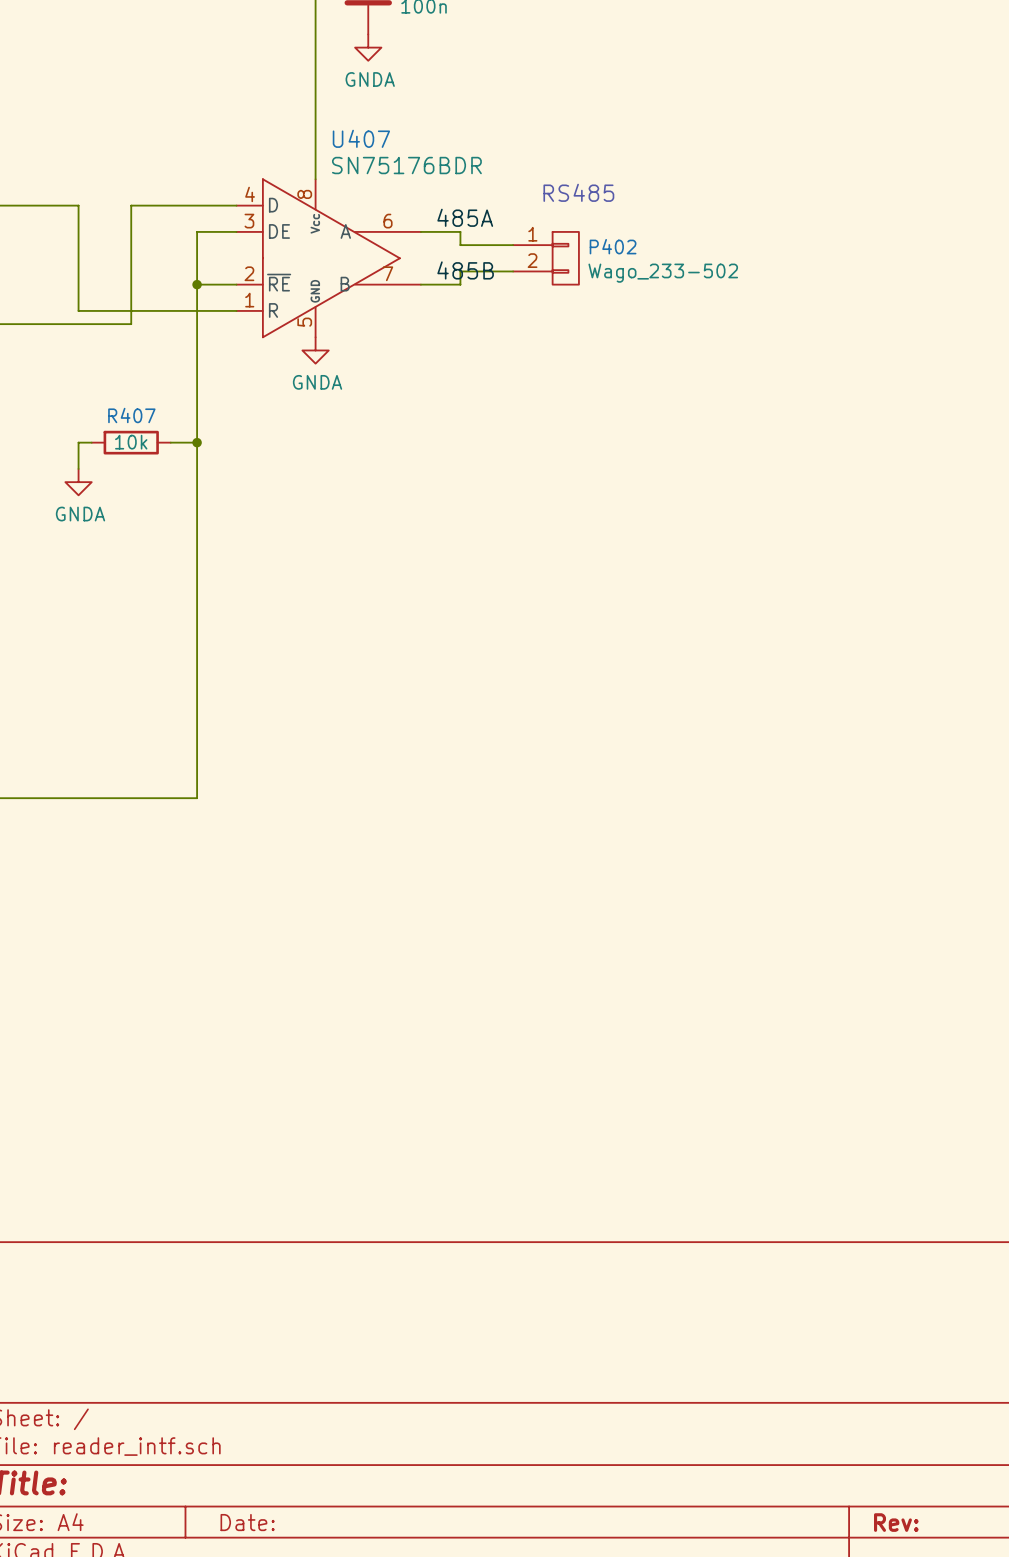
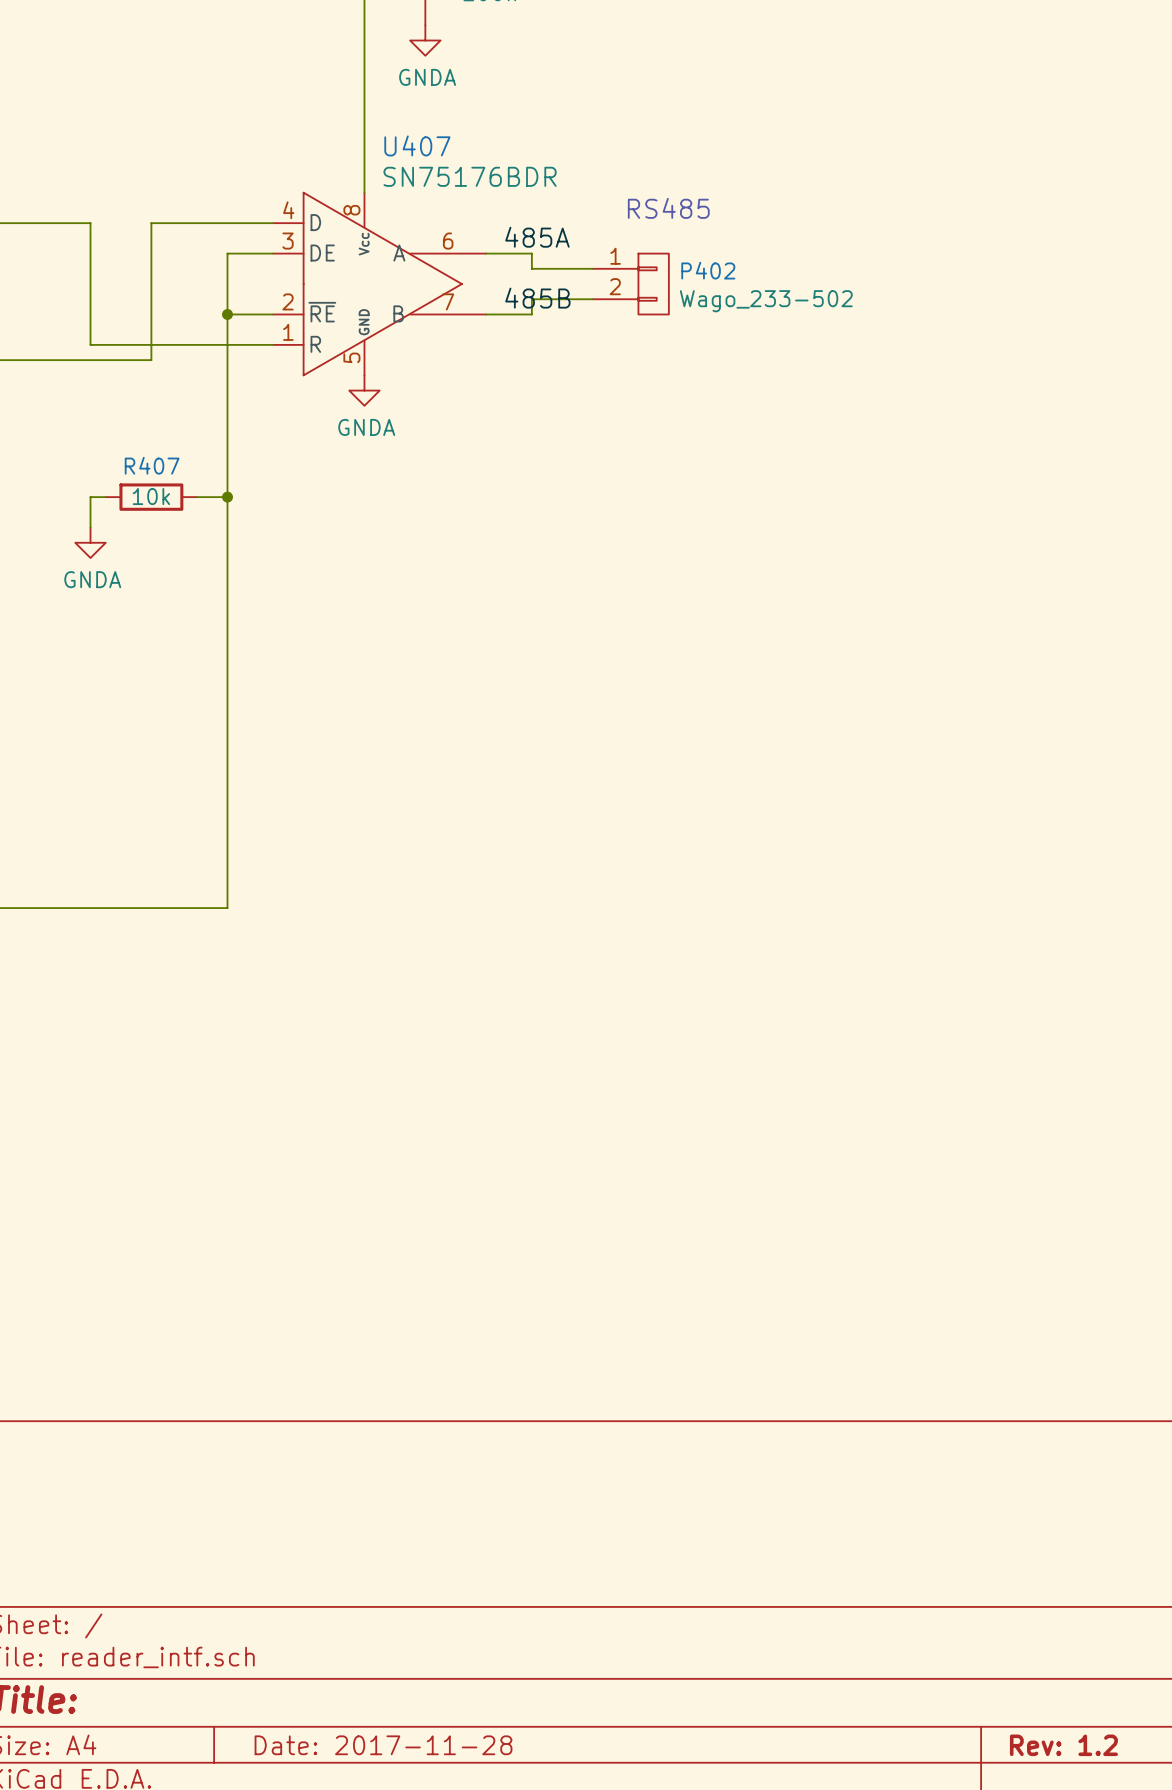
title block: Date: (247, 1522) -> Date: 2017-11-28 (383, 1745)
title block: Rev: (896, 1522) -> Rev: 1.2 (1063, 1745)

